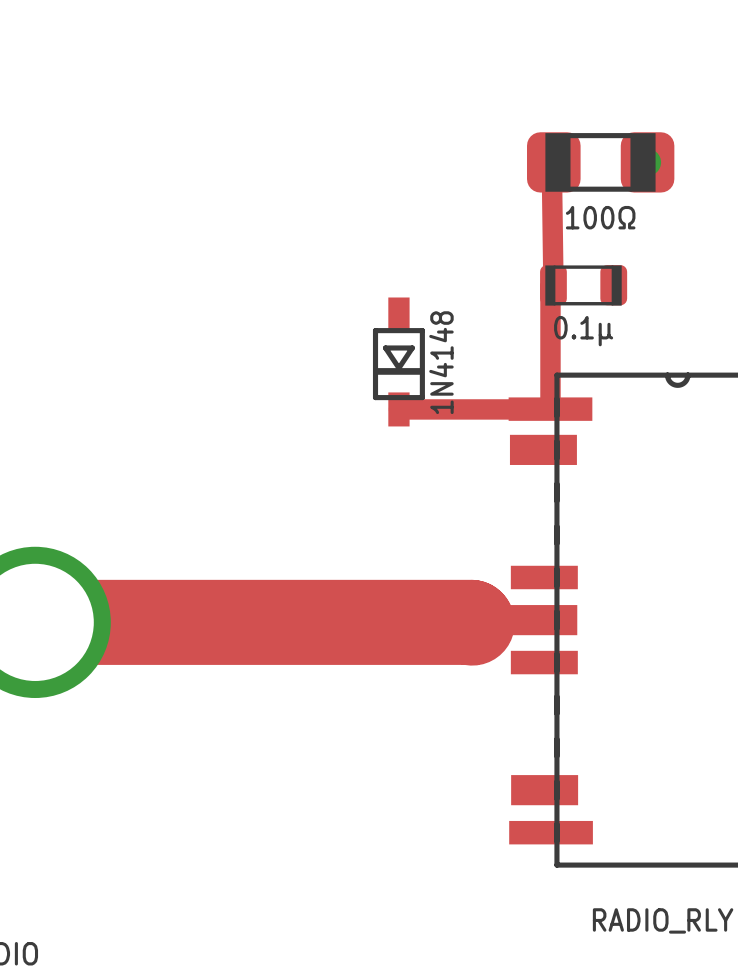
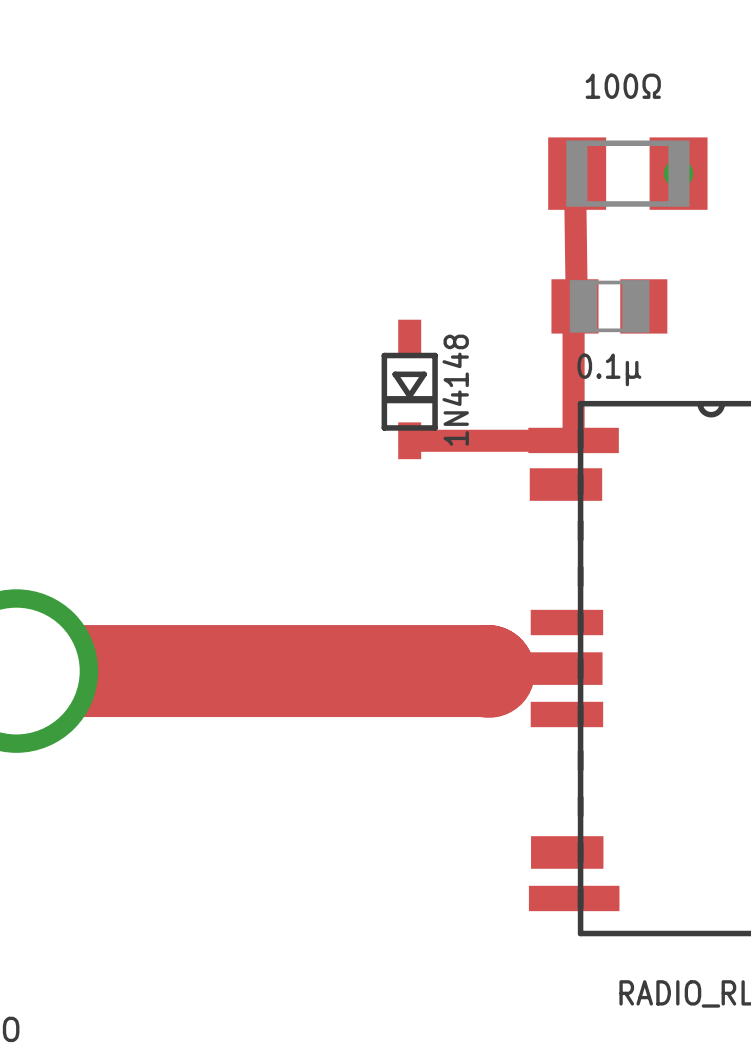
part footprint: [527, 132, 675, 193] -> [548, 137, 708, 210]
part value position: 100Ω (600, 217) -> 100Ω (623, 86)
part footprint: [540, 265, 628, 306] -> [551, 279, 668, 334]

